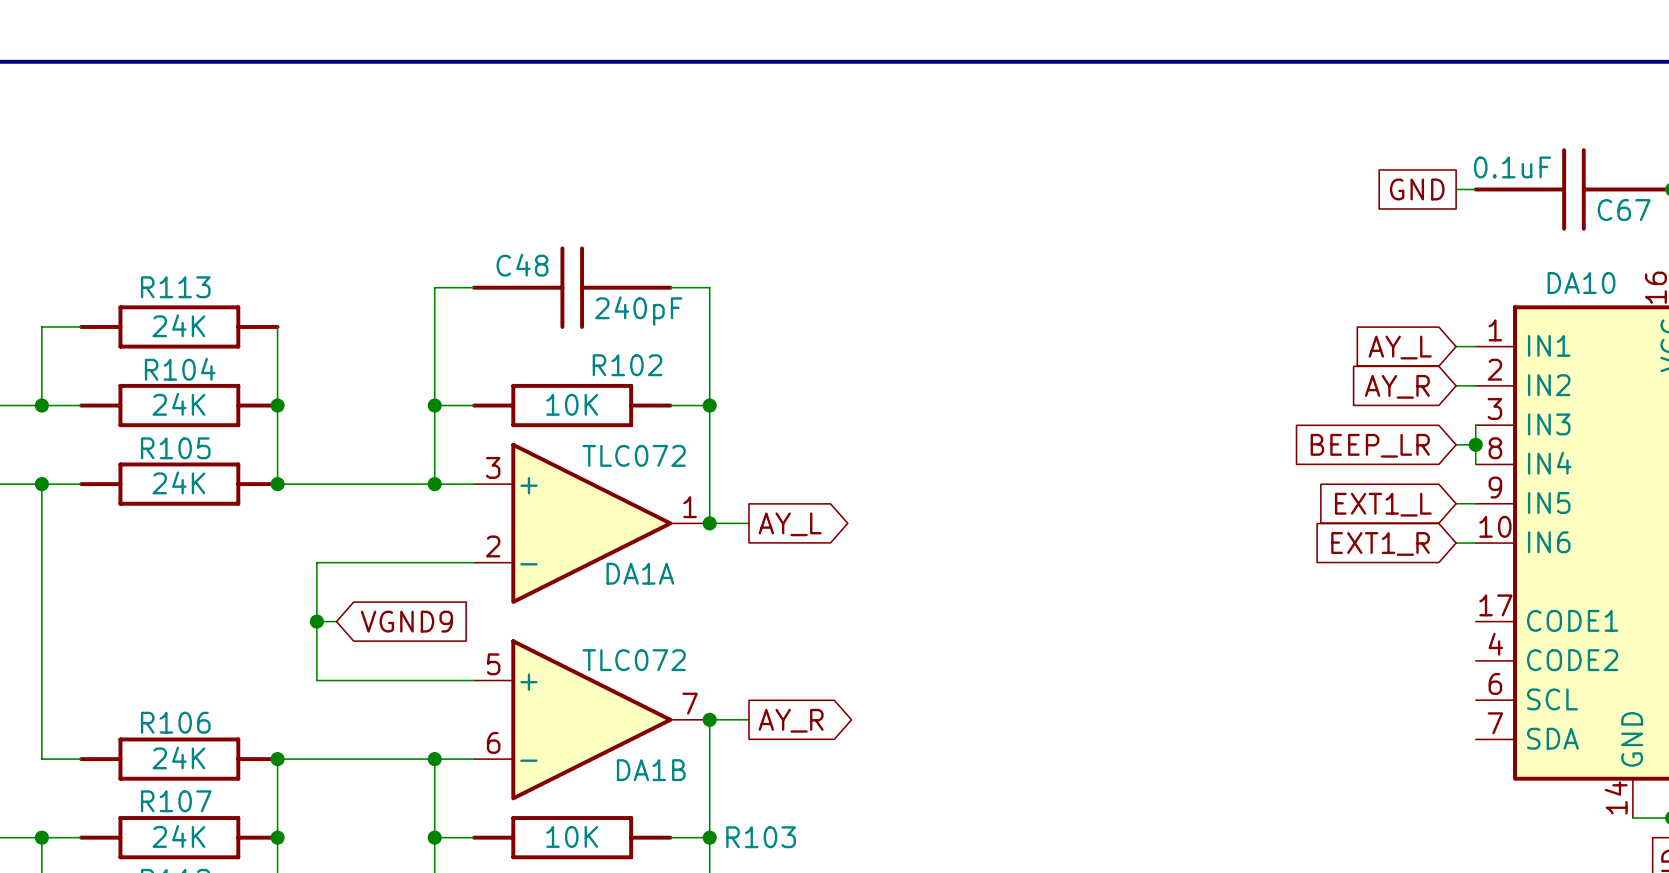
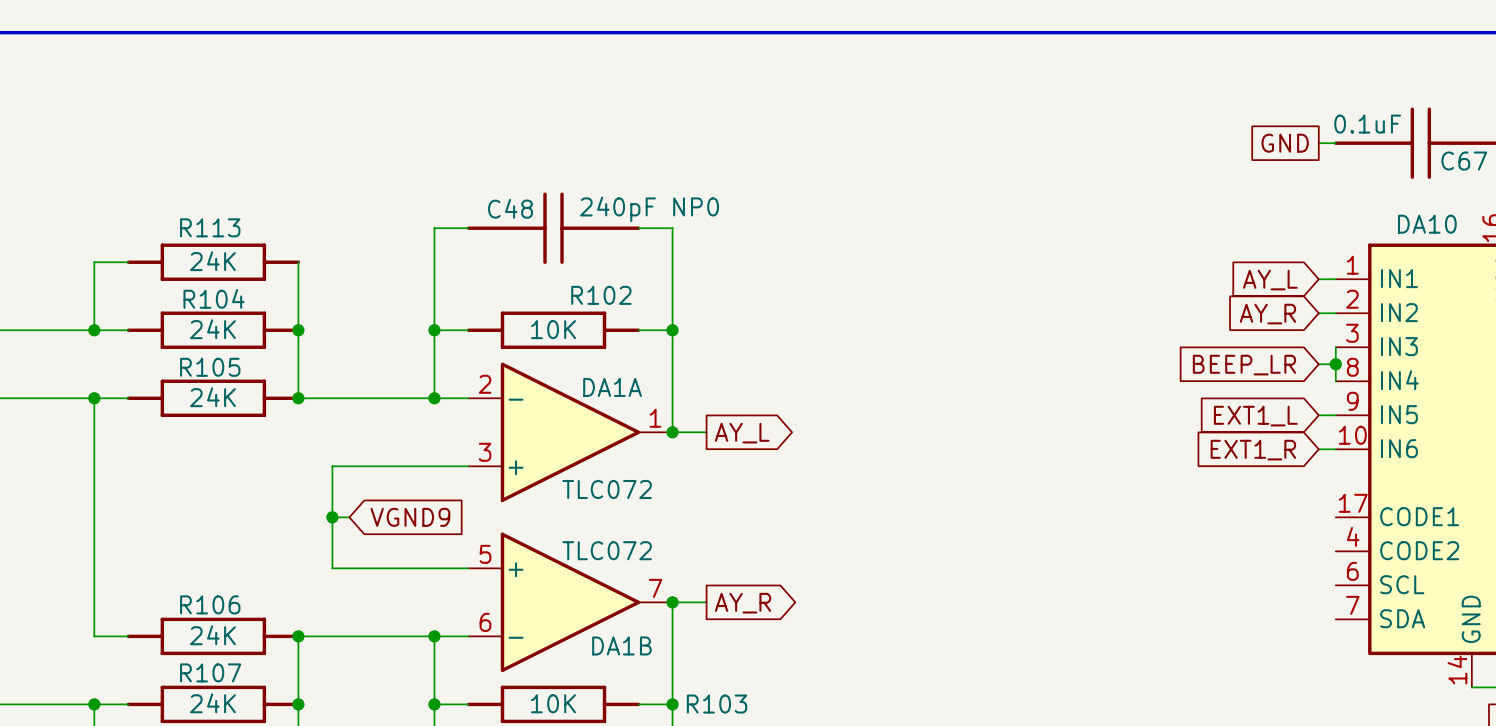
C48 value: 240pF (638, 311) -> 240pF NP0 (649, 209)
DA1A flip: as is (591, 523) -> up-down (570, 432)

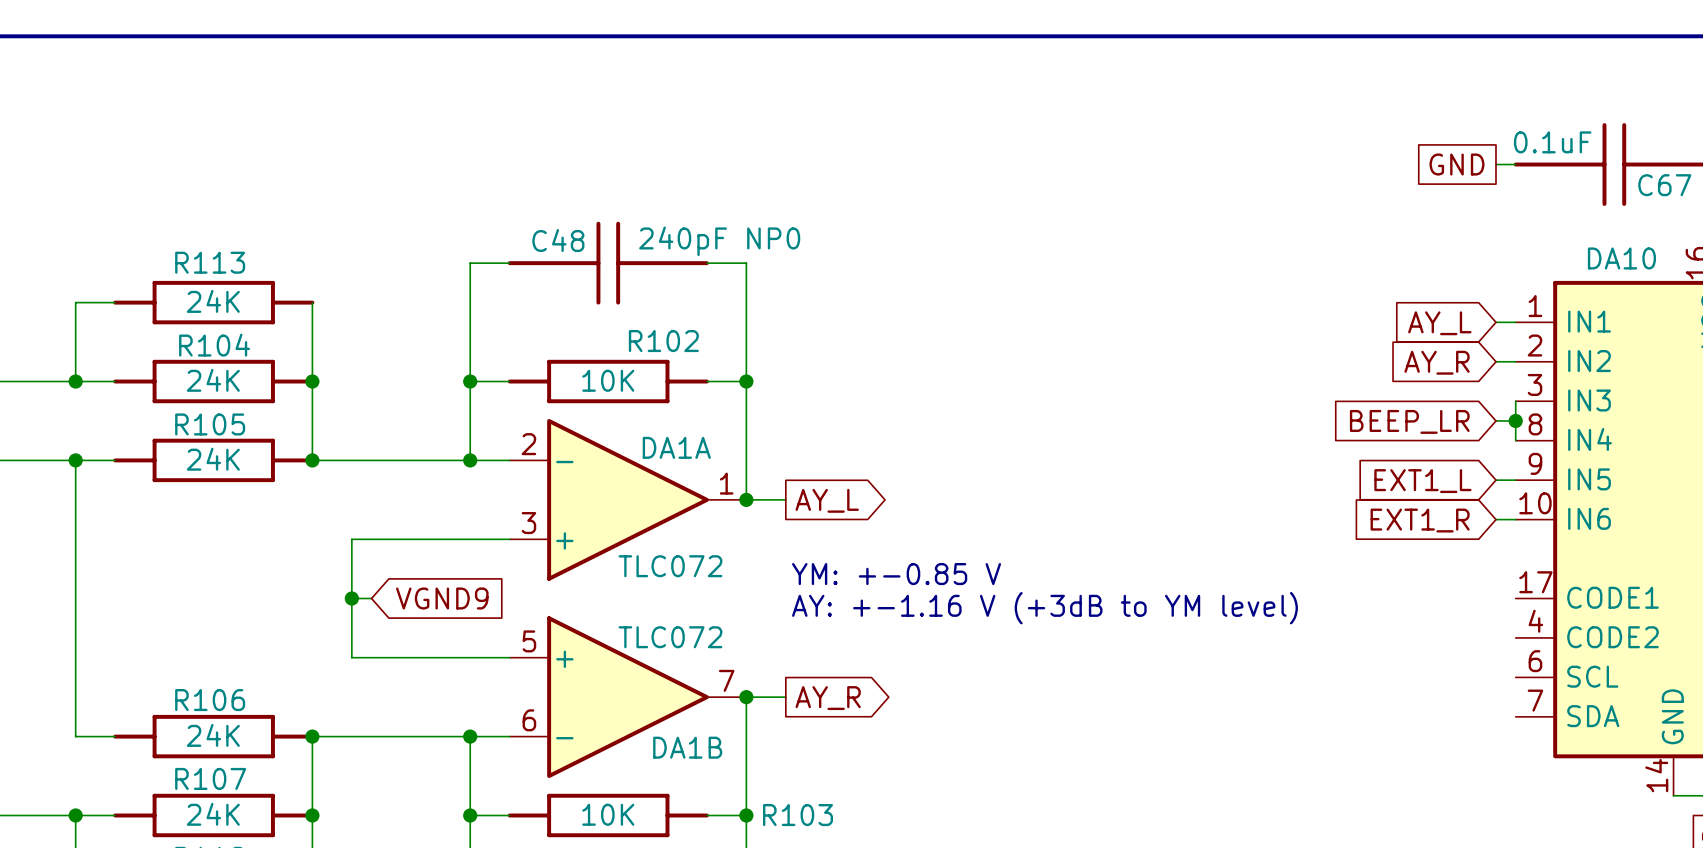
text: none -> YM: +-0.85 V (896, 574)
text: none -> AY: +-1.16 V (+3dB to YM level) (1044, 608)

